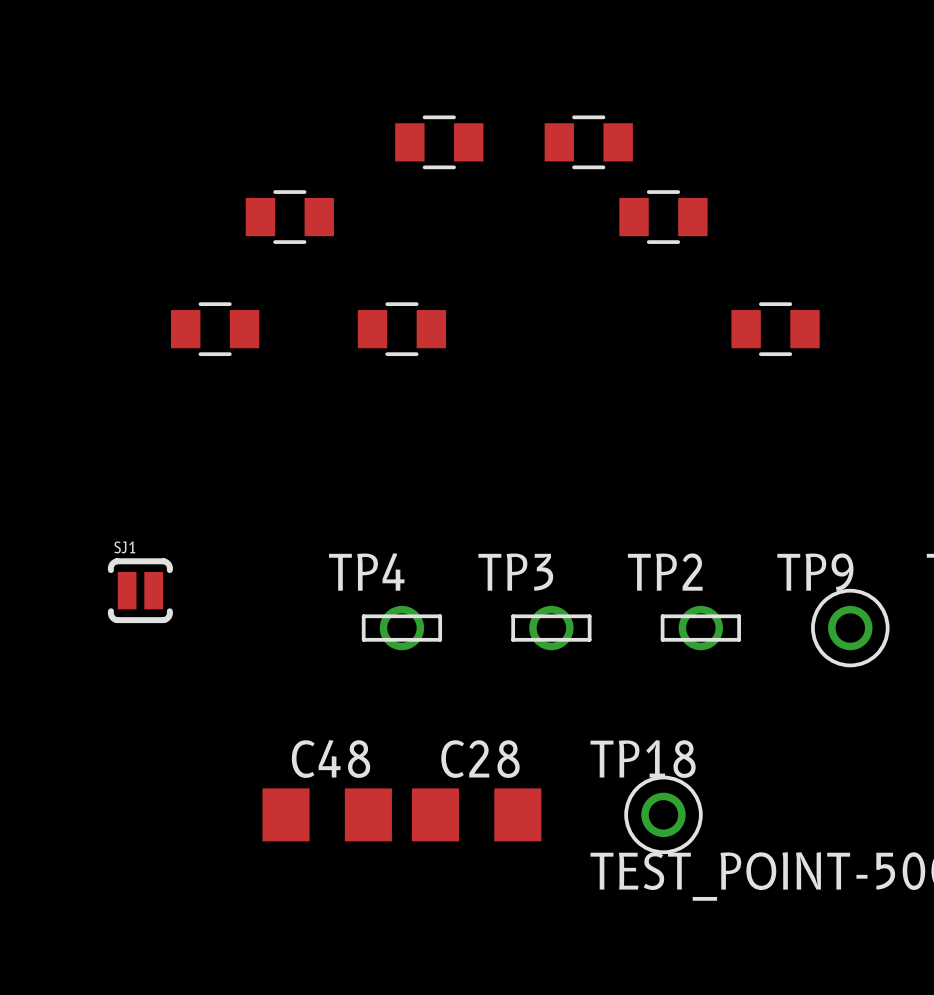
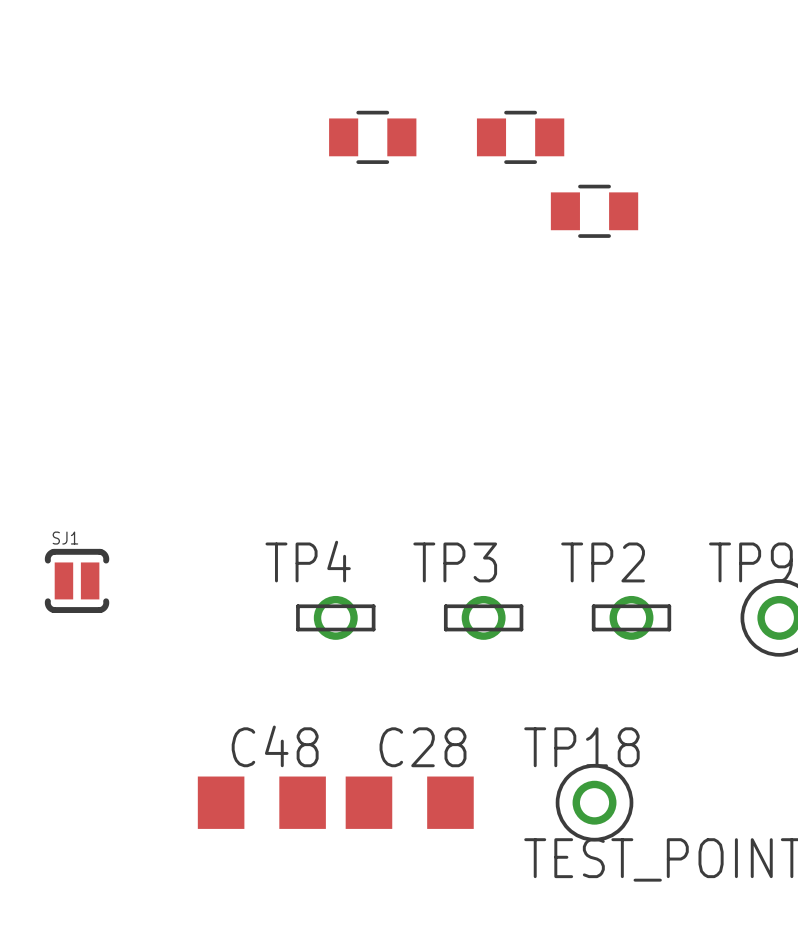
part: (289, 217) -> none
part: (215, 329) -> none
part: (401, 329) -> none
part: (775, 329) -> none

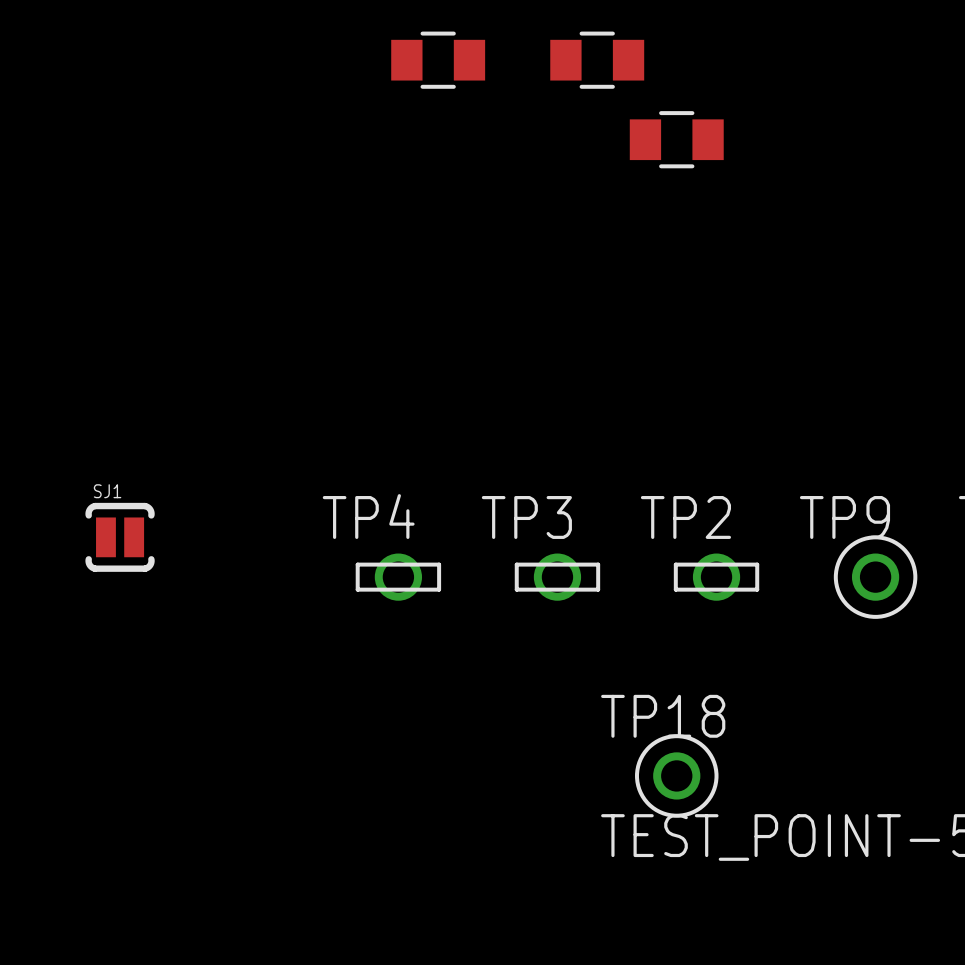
C48: (261, 802) -> none
C28: (409, 802) -> none

